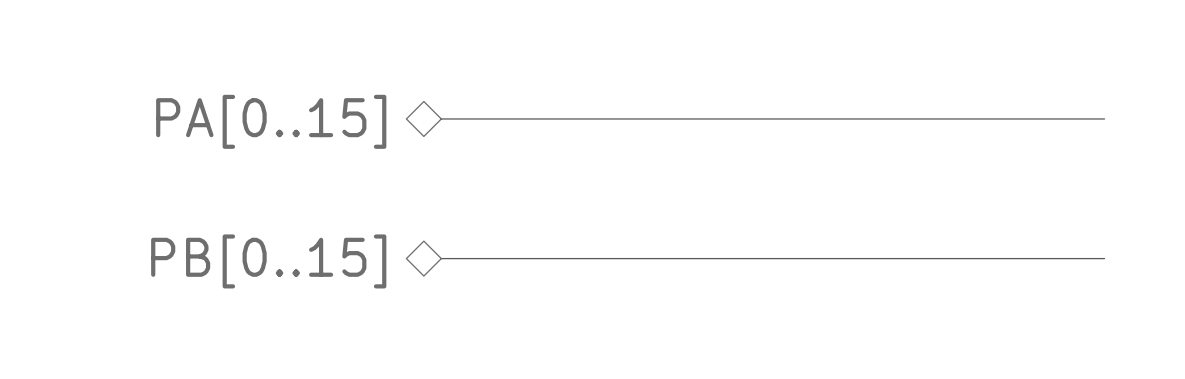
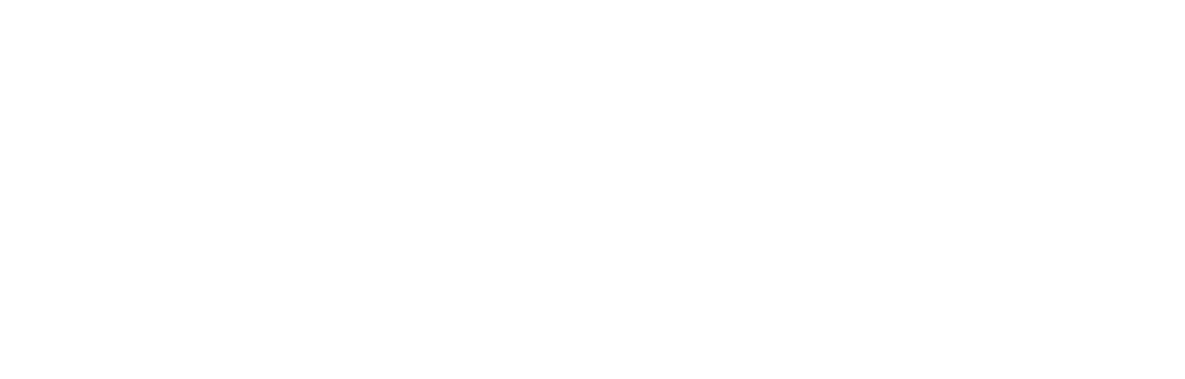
bus: (441, 118) (1104, 118) -> none
hierarchical label: PA[0..15] (271, 121) -> none
bus: (441, 258) (1104, 258) -> none
hierarchical label: PB[0..15] (268, 261) -> none

